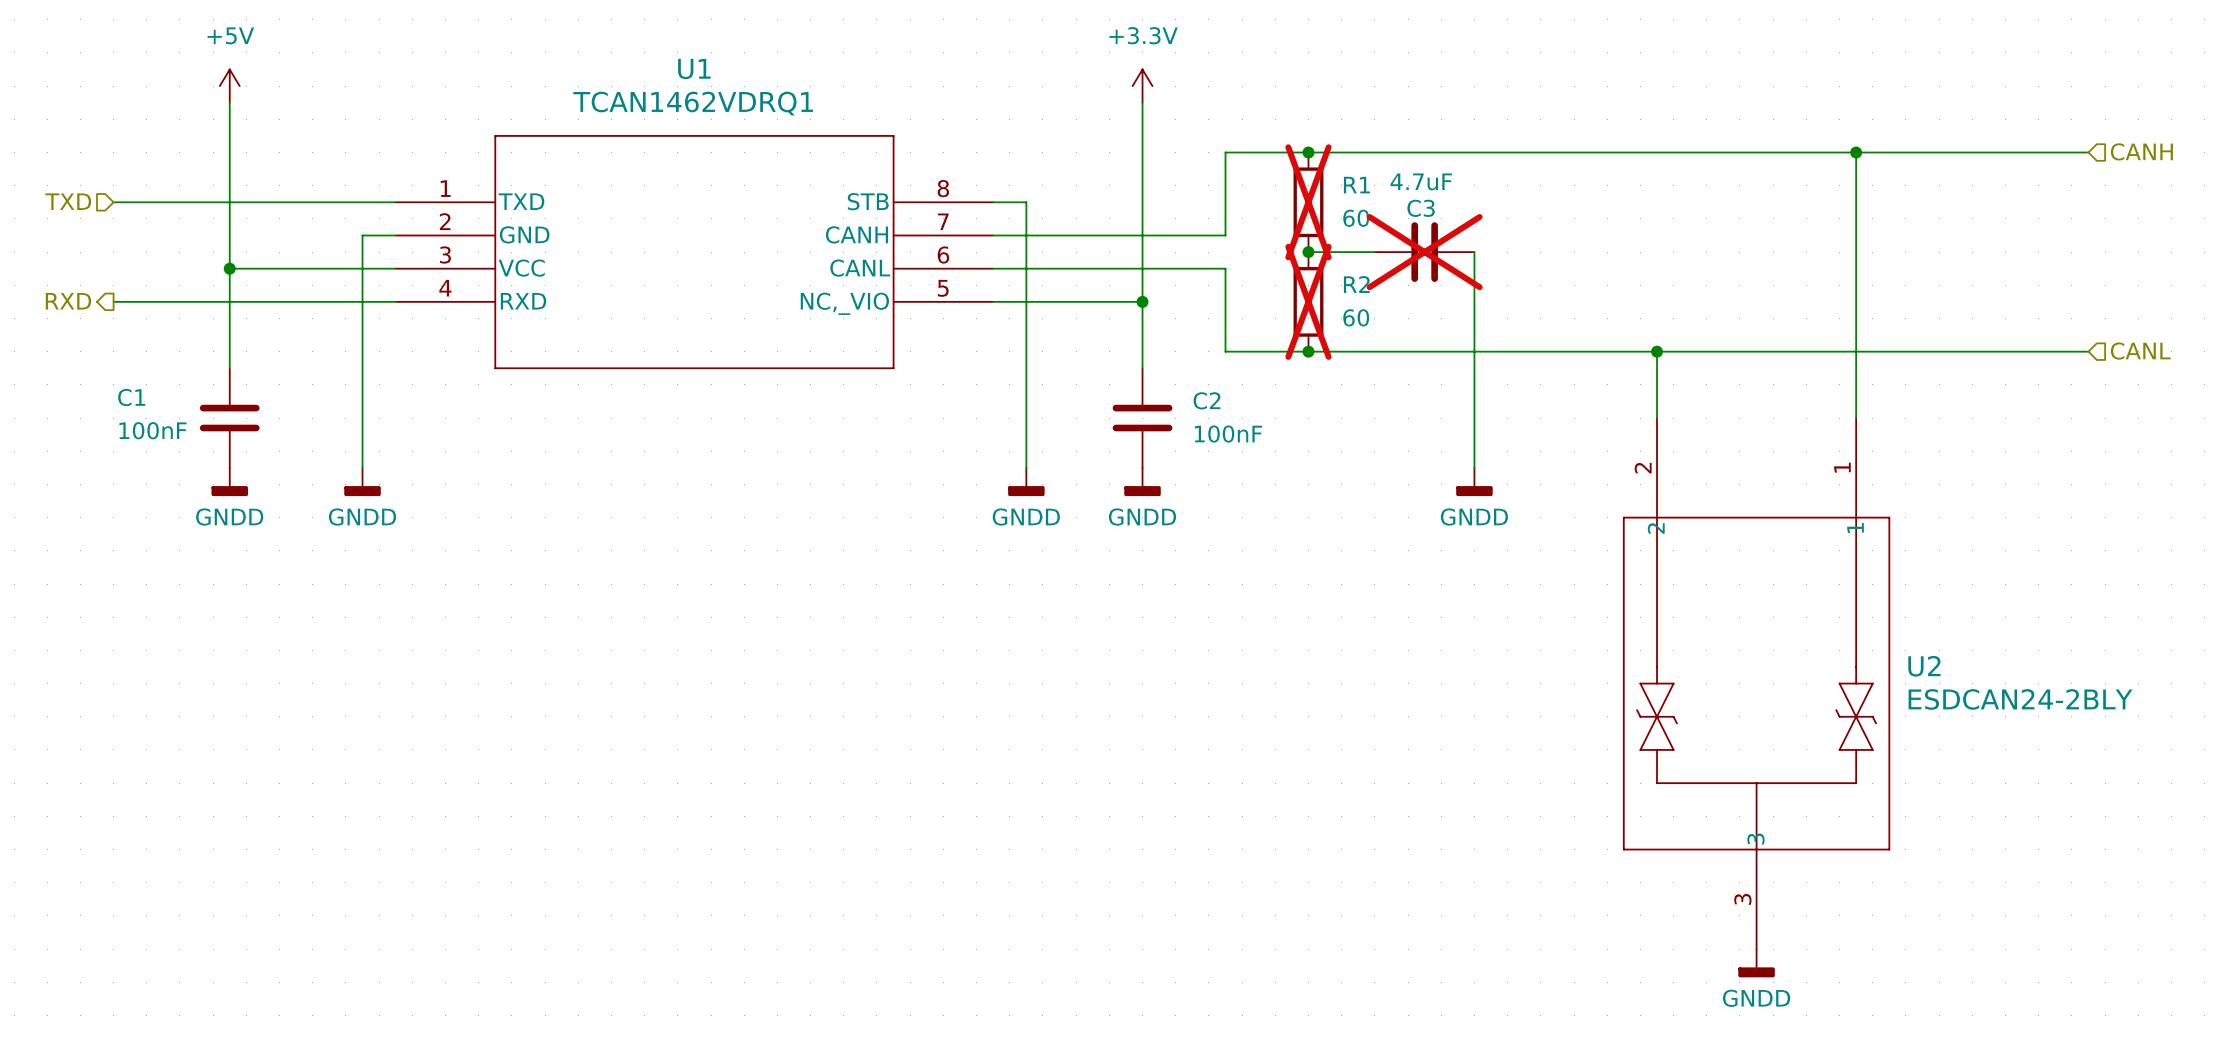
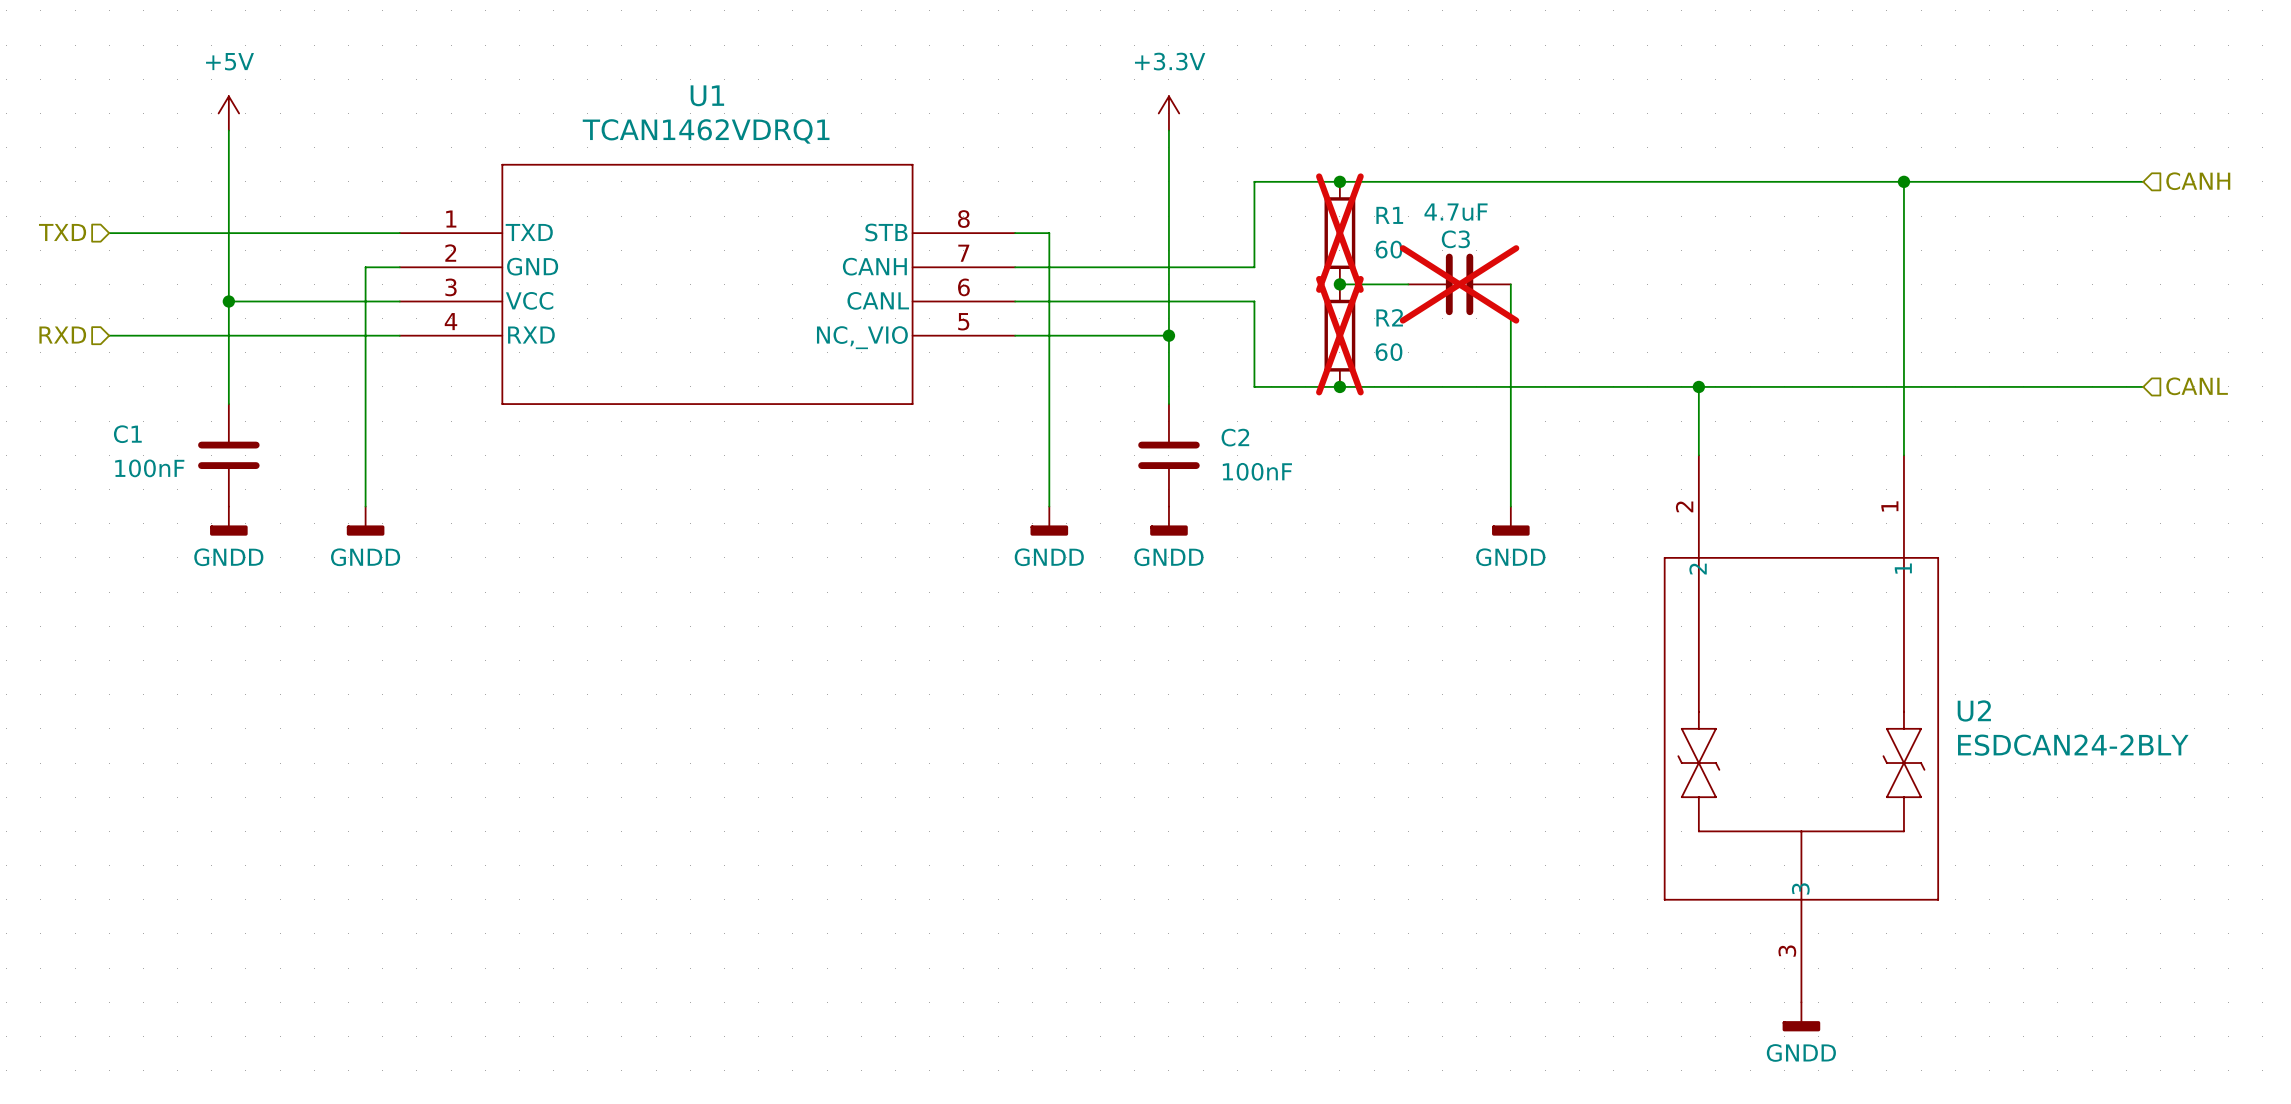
hierarchical label shape: output (68, 301) -> input (62, 335)

